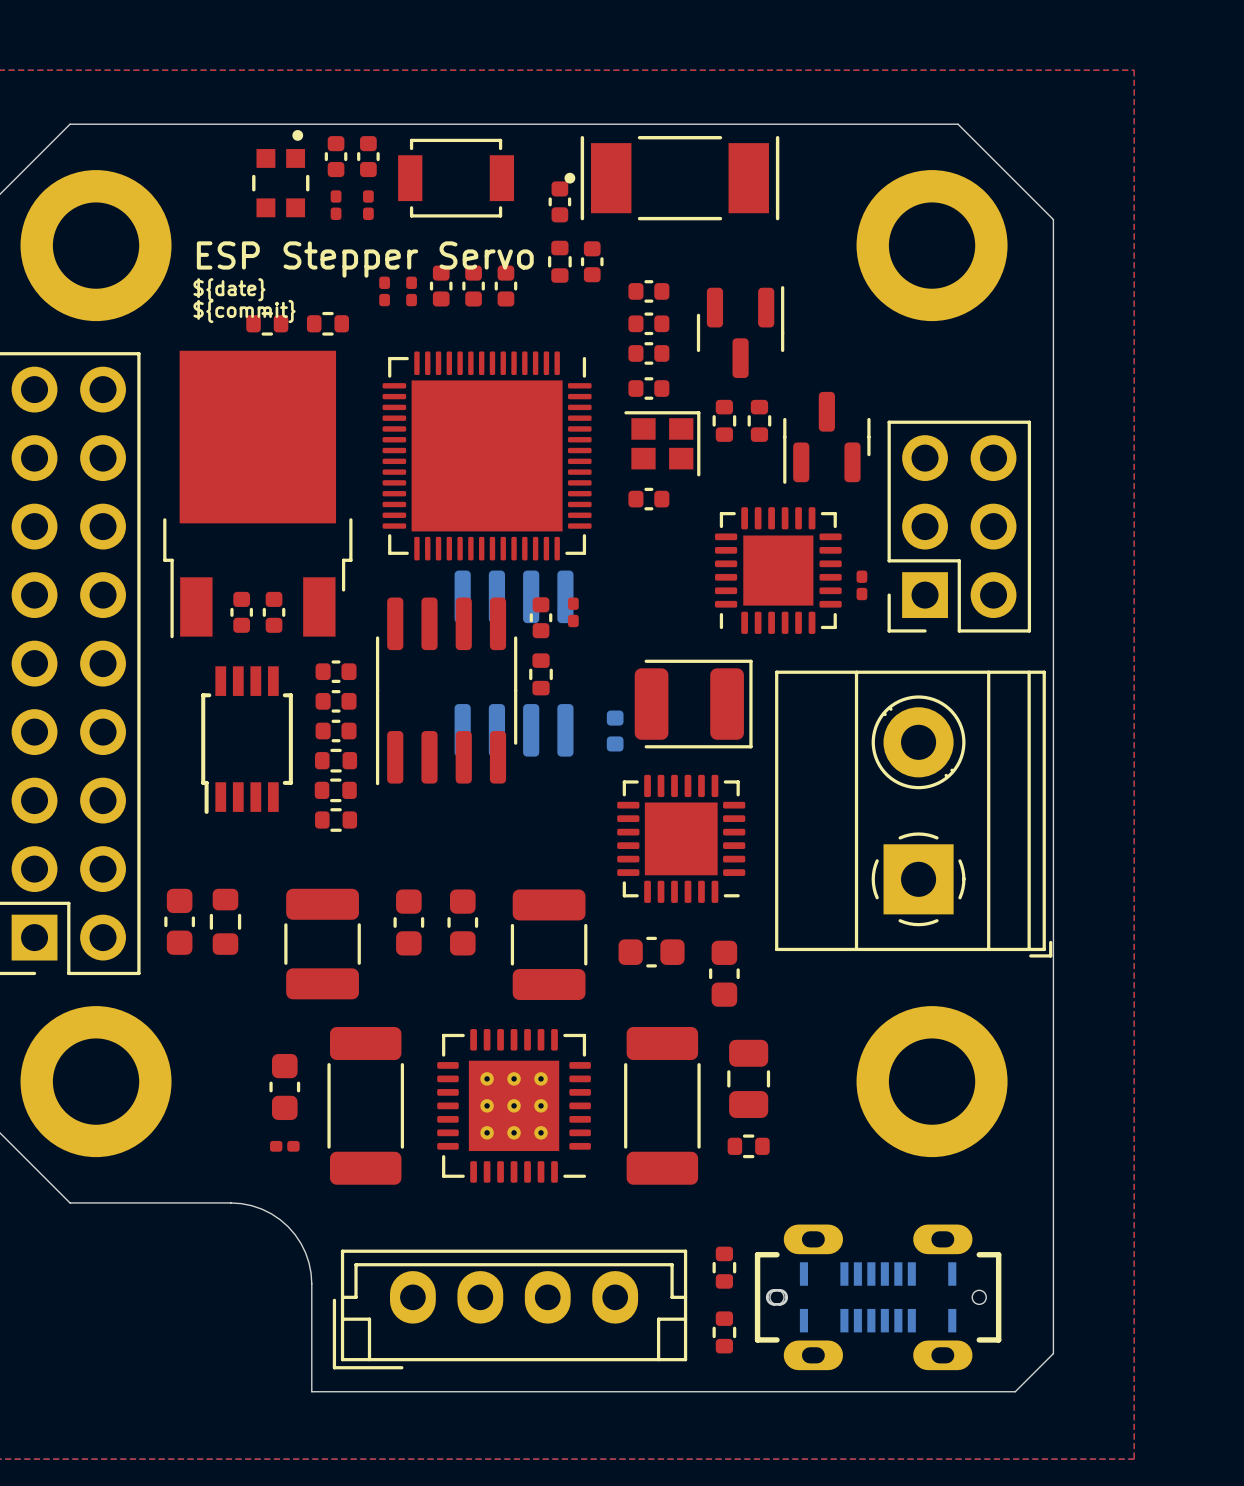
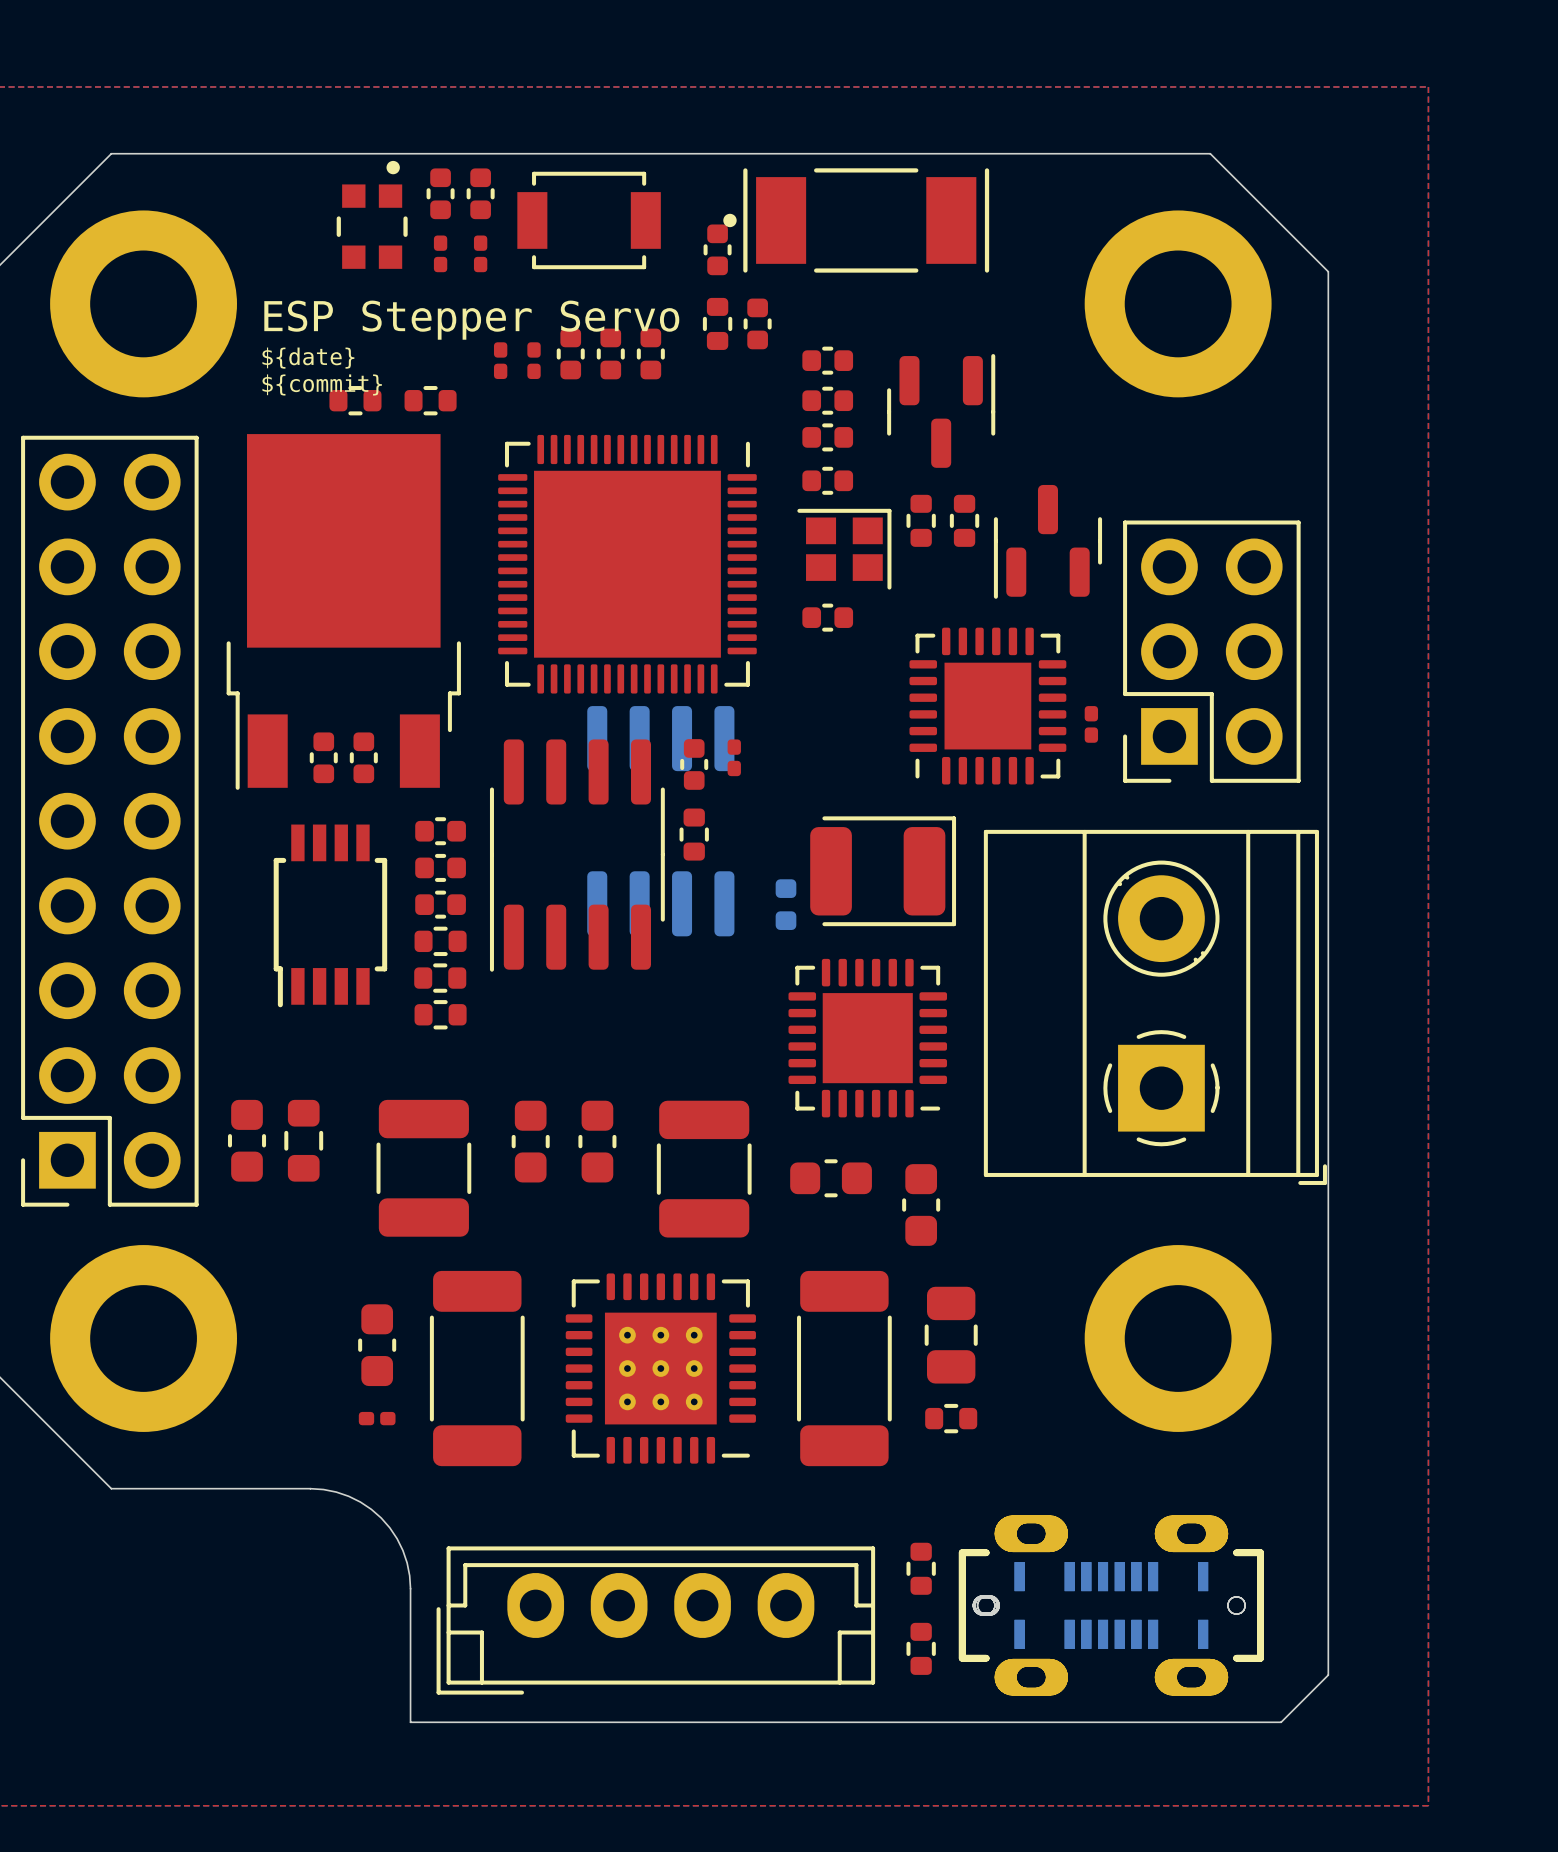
part: none -> (1111, 1605)

